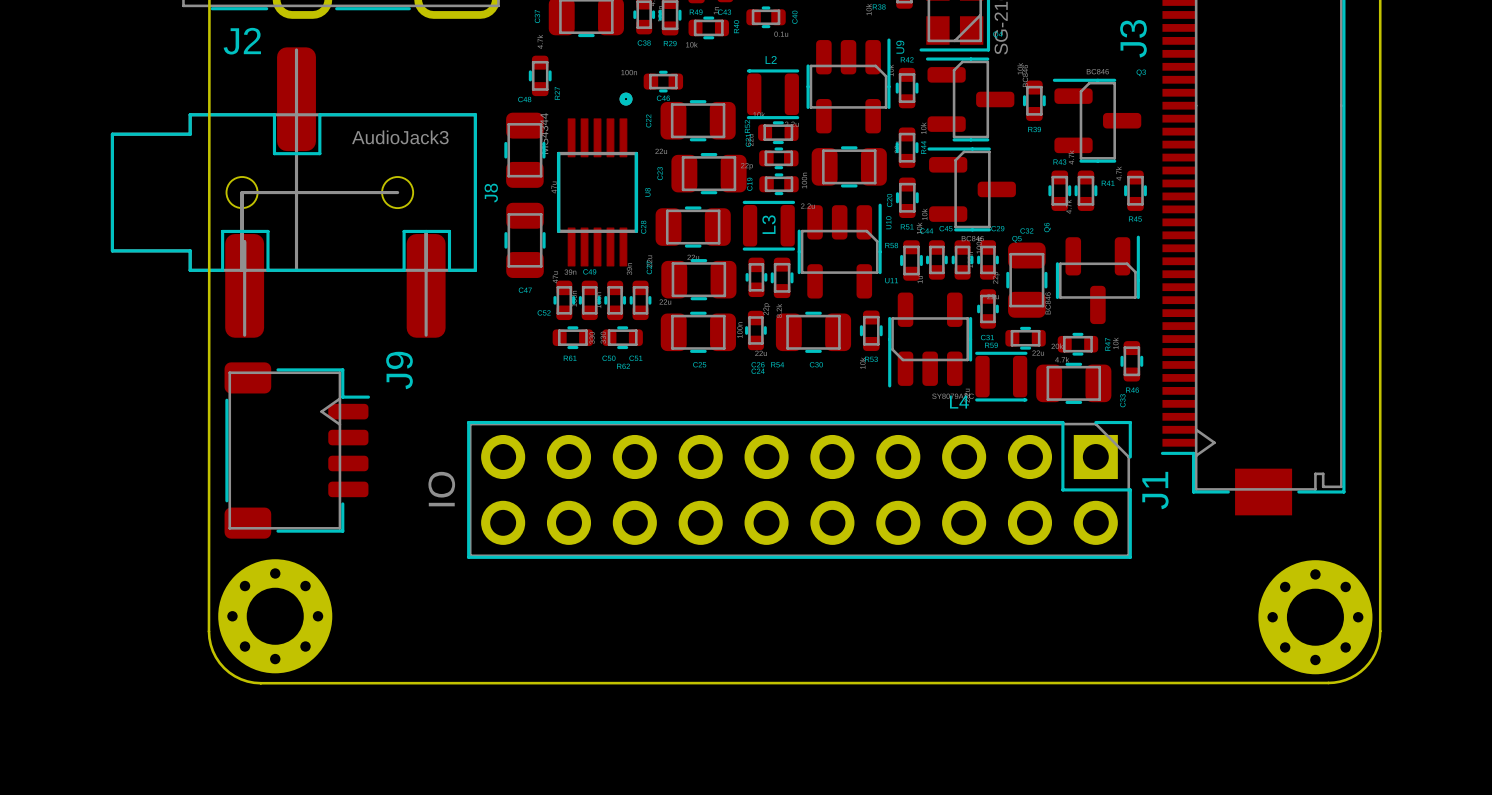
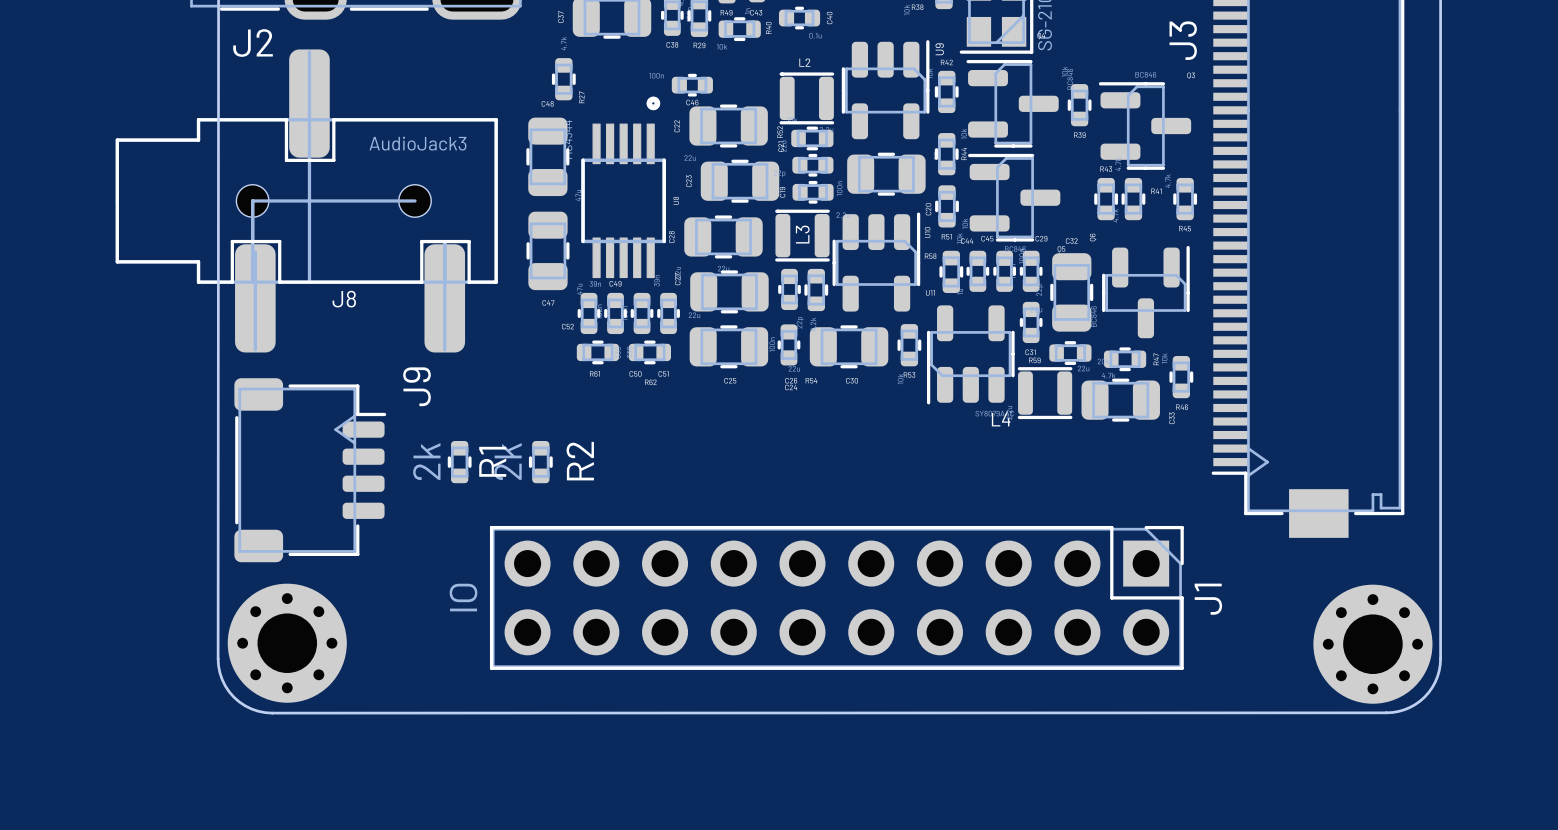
J8 name rotation: 0° (491, 193) -> 90° clockwise (344, 299)
J8 name position: J8 (491, 193) -> J8 (344, 299)
R1: none -> 2k (459, 462)
R2: none -> 2k (540, 462)
J1 position: (799, 489) -> (836, 597)

